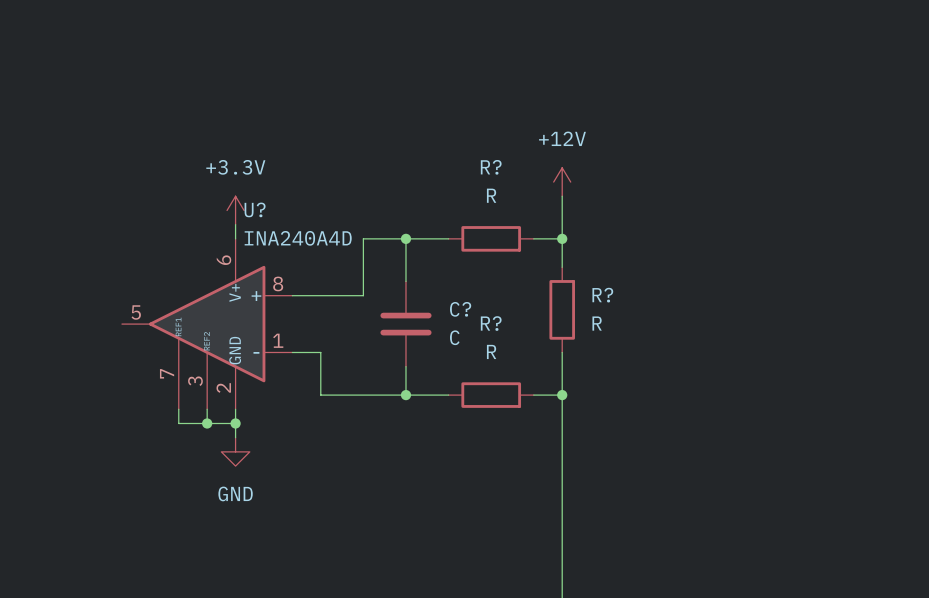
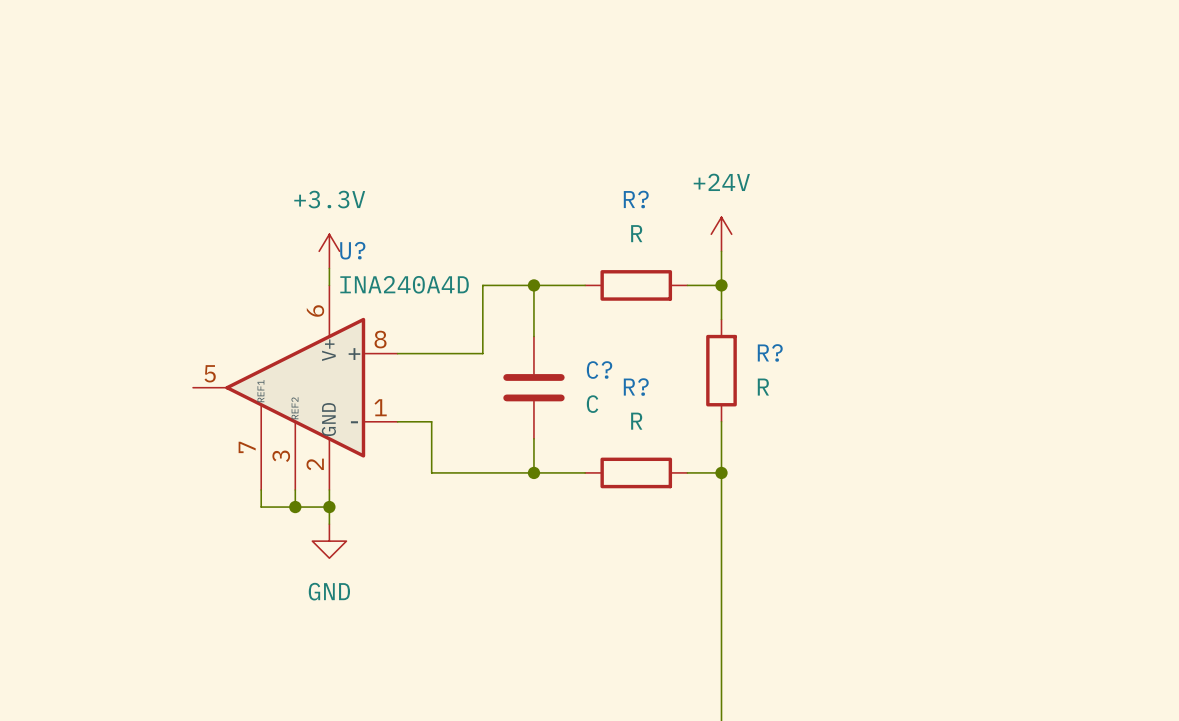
power symbol: +12V (562, 182) -> none
power symbol: none -> +24V (721, 234)

